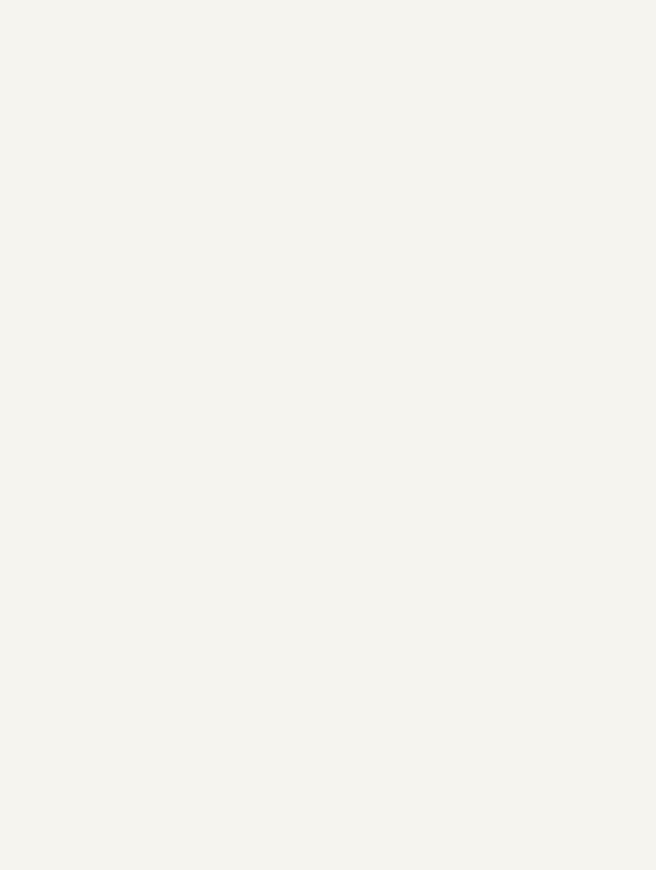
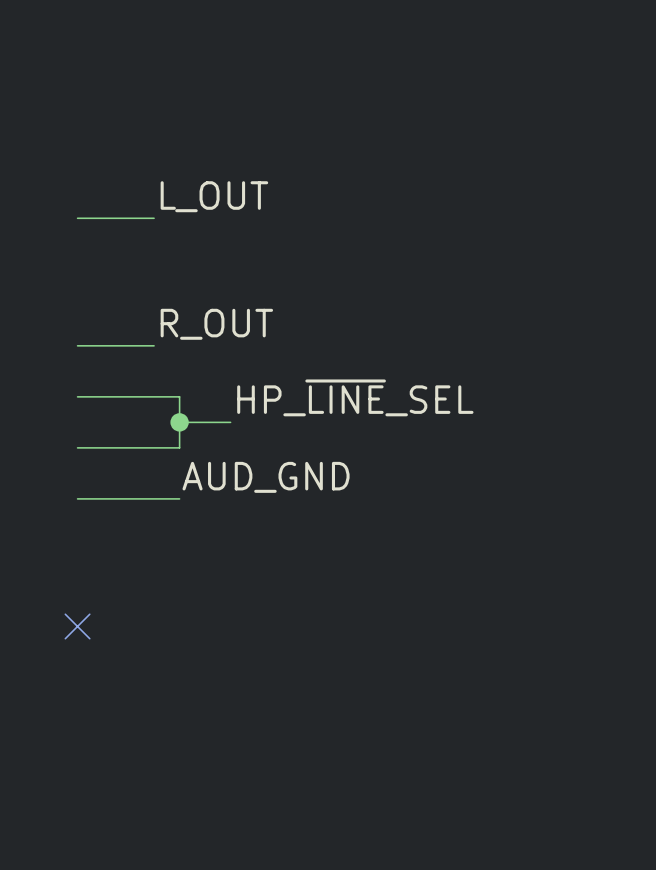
label: none -> L_OUT (214, 196)
wire: none -> (77, 218) (154, 218)
label: none -> R_OUT (216, 324)
wire: none -> (77, 345) (154, 345)
wire: none -> (77, 396) (179, 396) (179, 447) (77, 447)
label: none -> HP_~{LINE}_SEL (355, 397)
wire: none -> (179, 422) (230, 422)
junction: none -> (179, 422)
label: none -> AUD_GND (266, 477)
wire: none -> (77, 498) (179, 498)
no-connect mark: none -> (77, 626)

